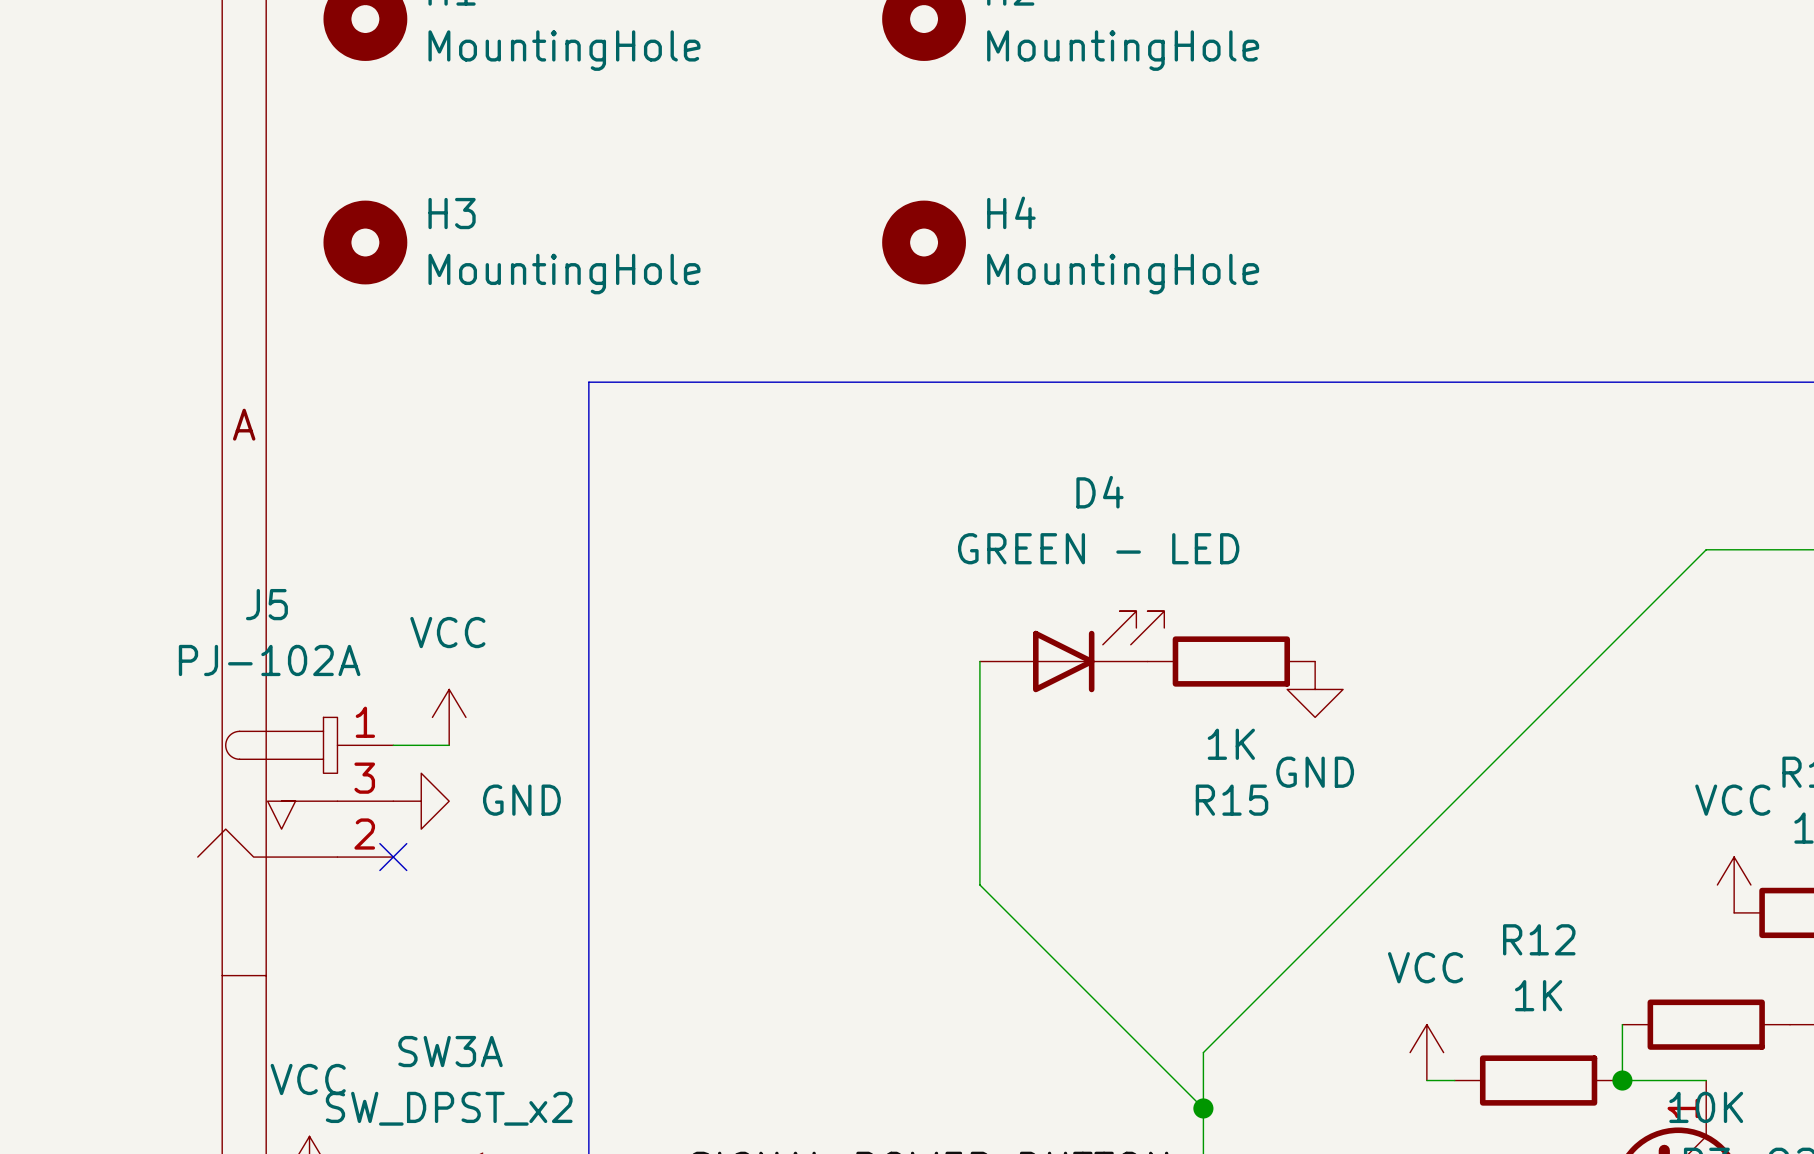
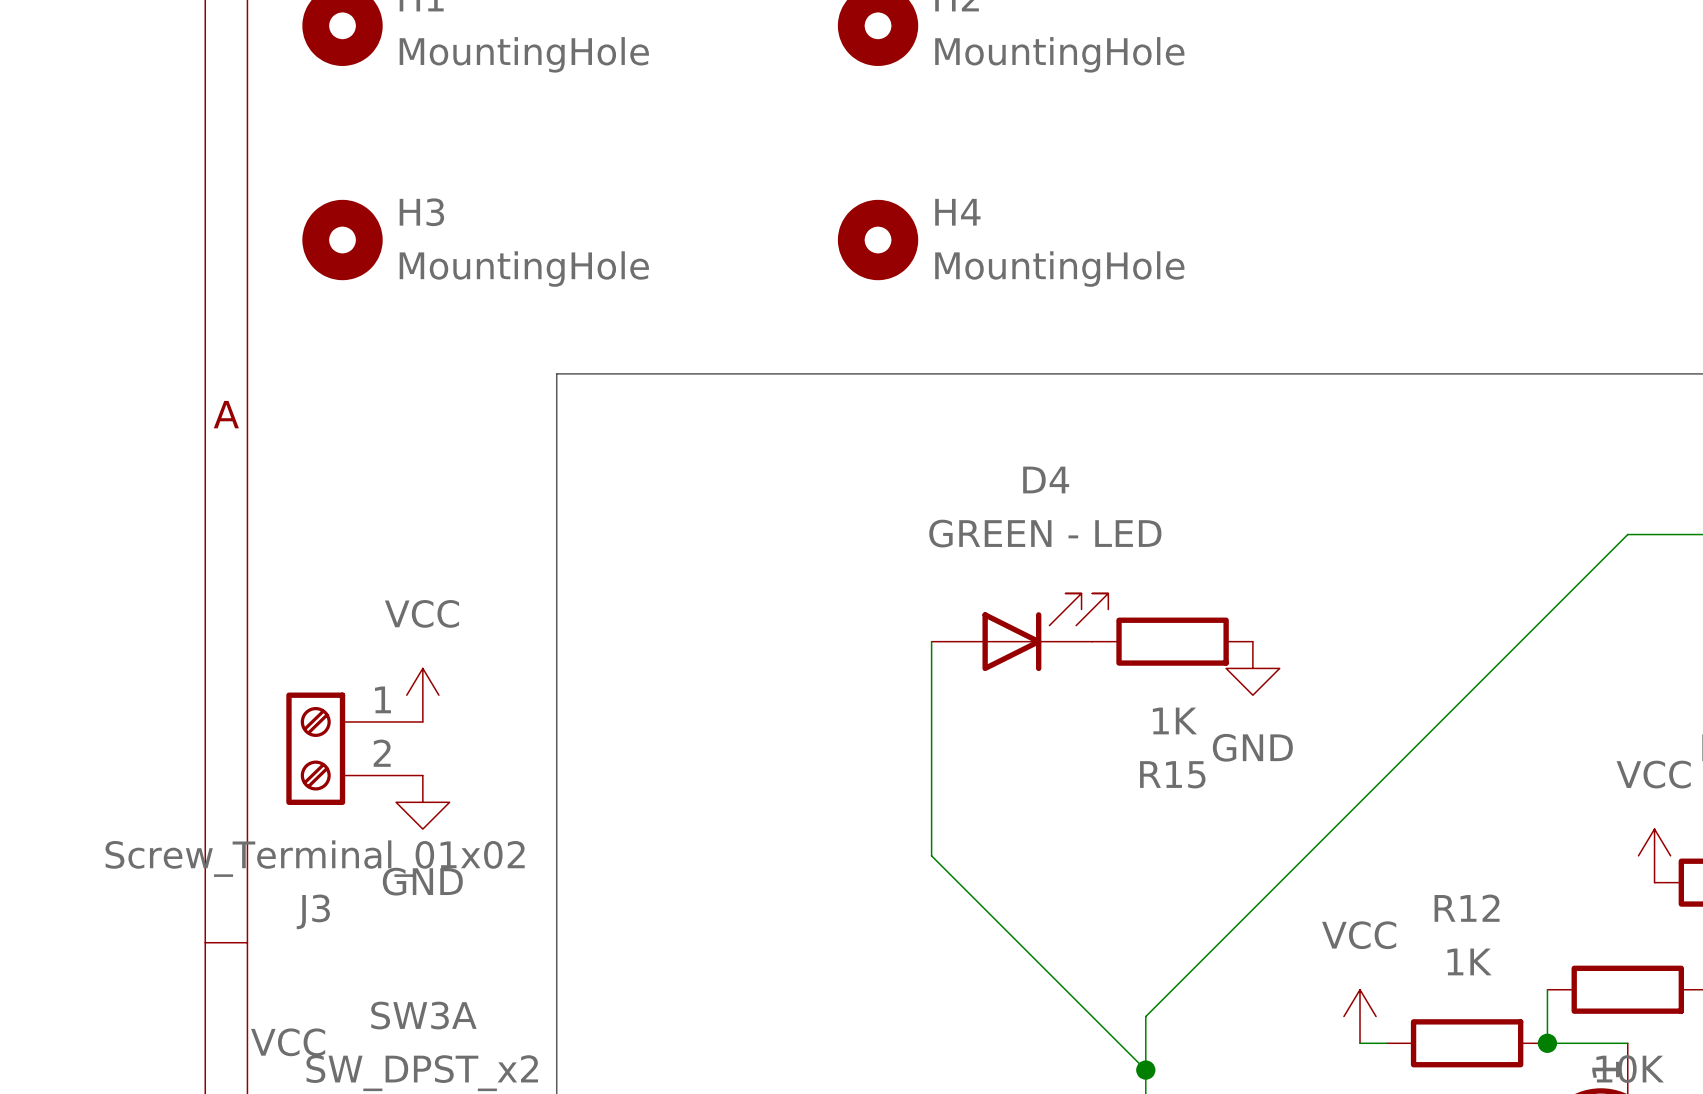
J3: none -> Screw_Terminal_01x02 (354, 748)
J5: PJ-102A (295, 787) -> none
power symbol rotation: 0° (421, 801) -> 90° clockwise (422, 802)
power symbol position: GND (421, 801) -> GND (422, 802)
no-connect mark: (393, 857) -> none

